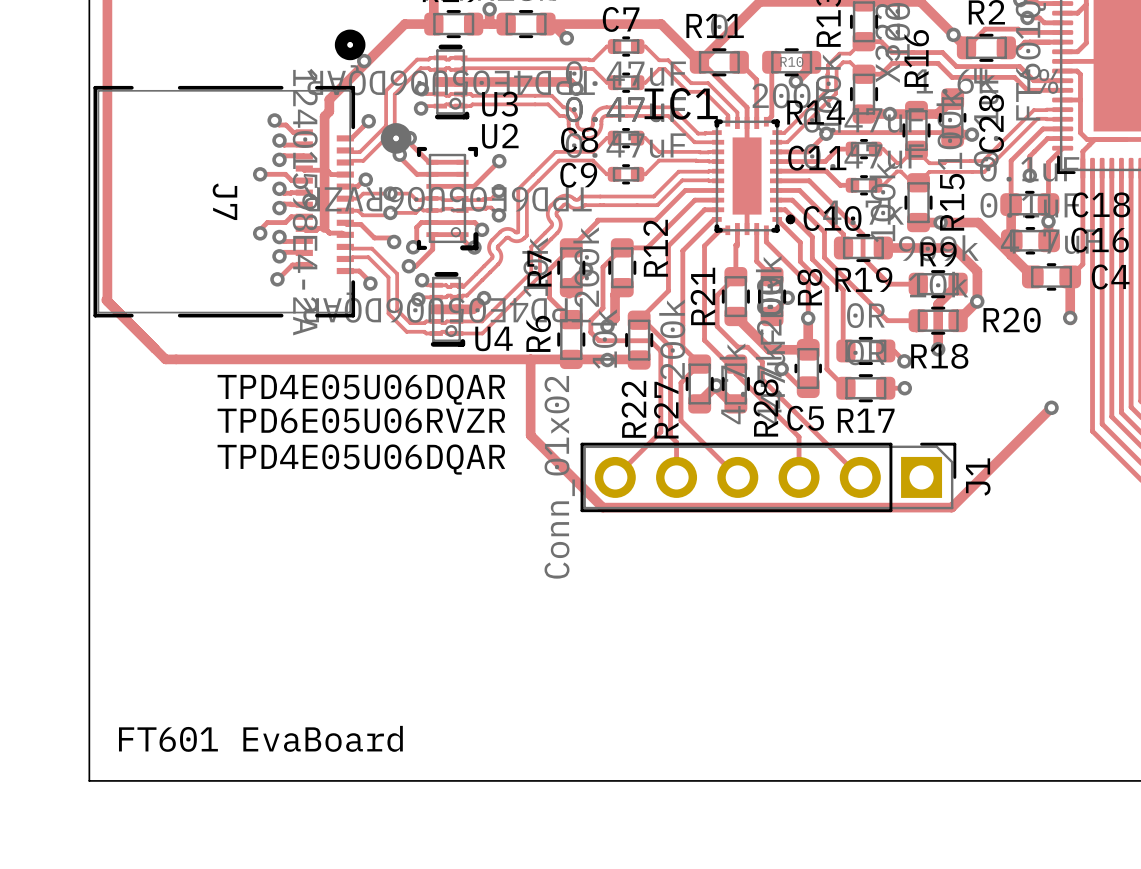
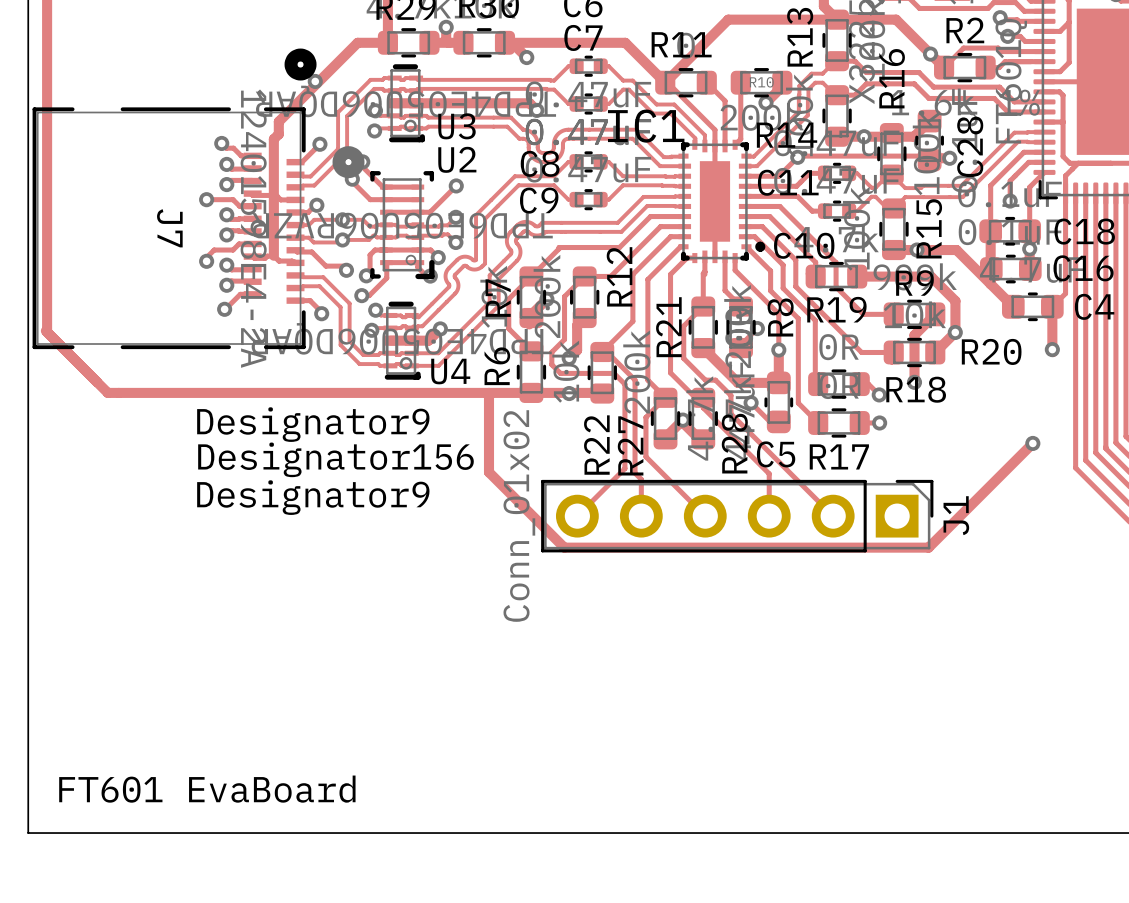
U3 text: TPD4E05U06DQAR (361, 389) -> Designator9 (313, 424)
U2 text: TPD6E05U06RVZR (361, 420) -> none
U2 text: none -> Designator156 (335, 459)
U4 text: TPD4E05U06DQAR (361, 459) -> Designator9 (313, 497)

